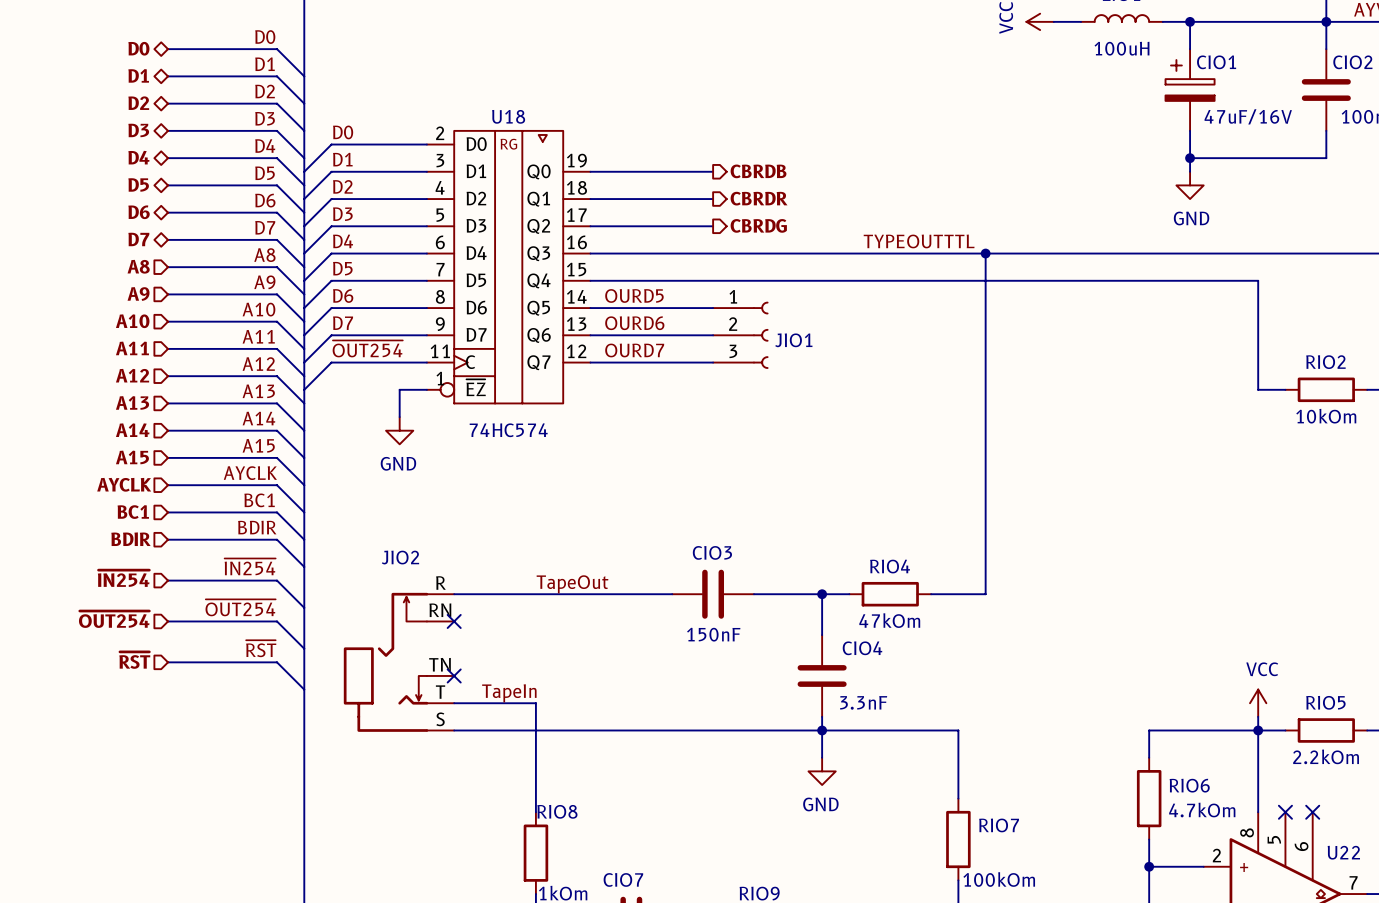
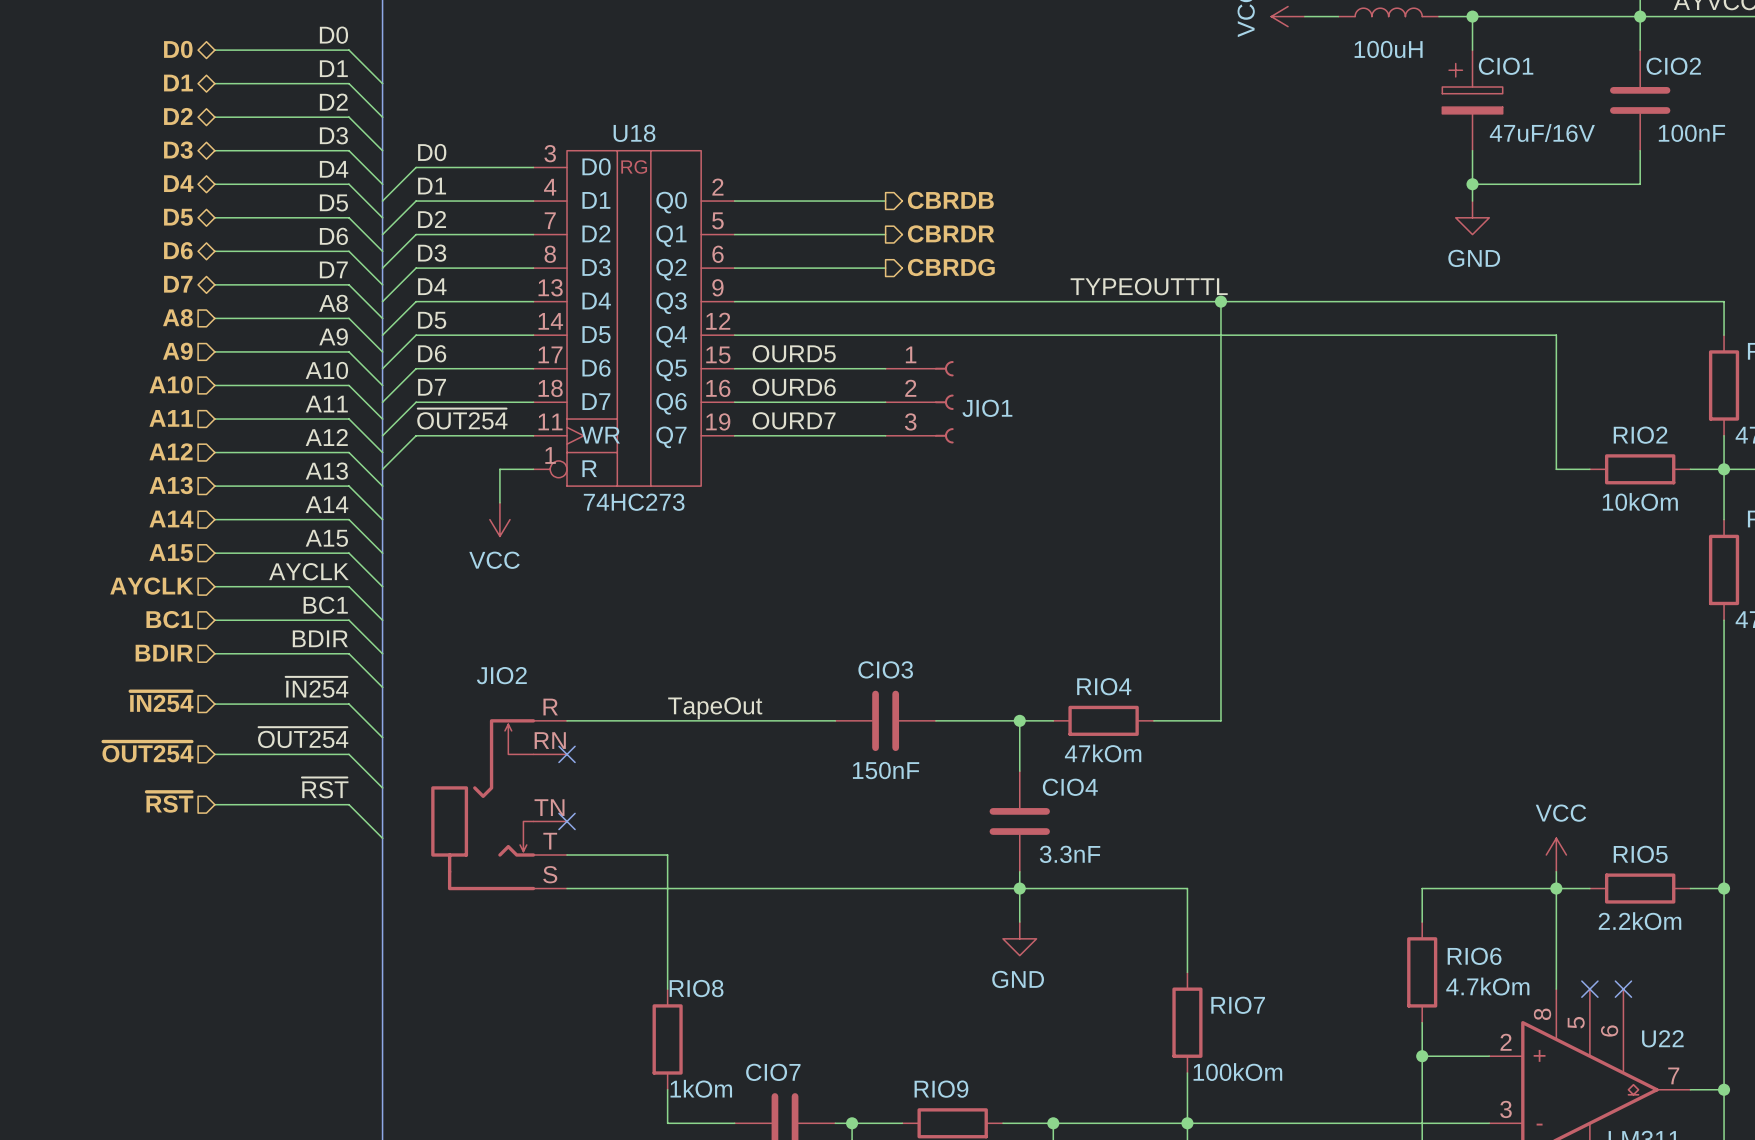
U18 symbol: [426, 130, 591, 404] -> [533, 150, 735, 487]
power symbol: GND (399, 430) -> VCC (499, 519)
U18 value: 74HC574 (508, 430) -> 74HC273 (634, 502)
label: TapeIn (509, 693) -> none

